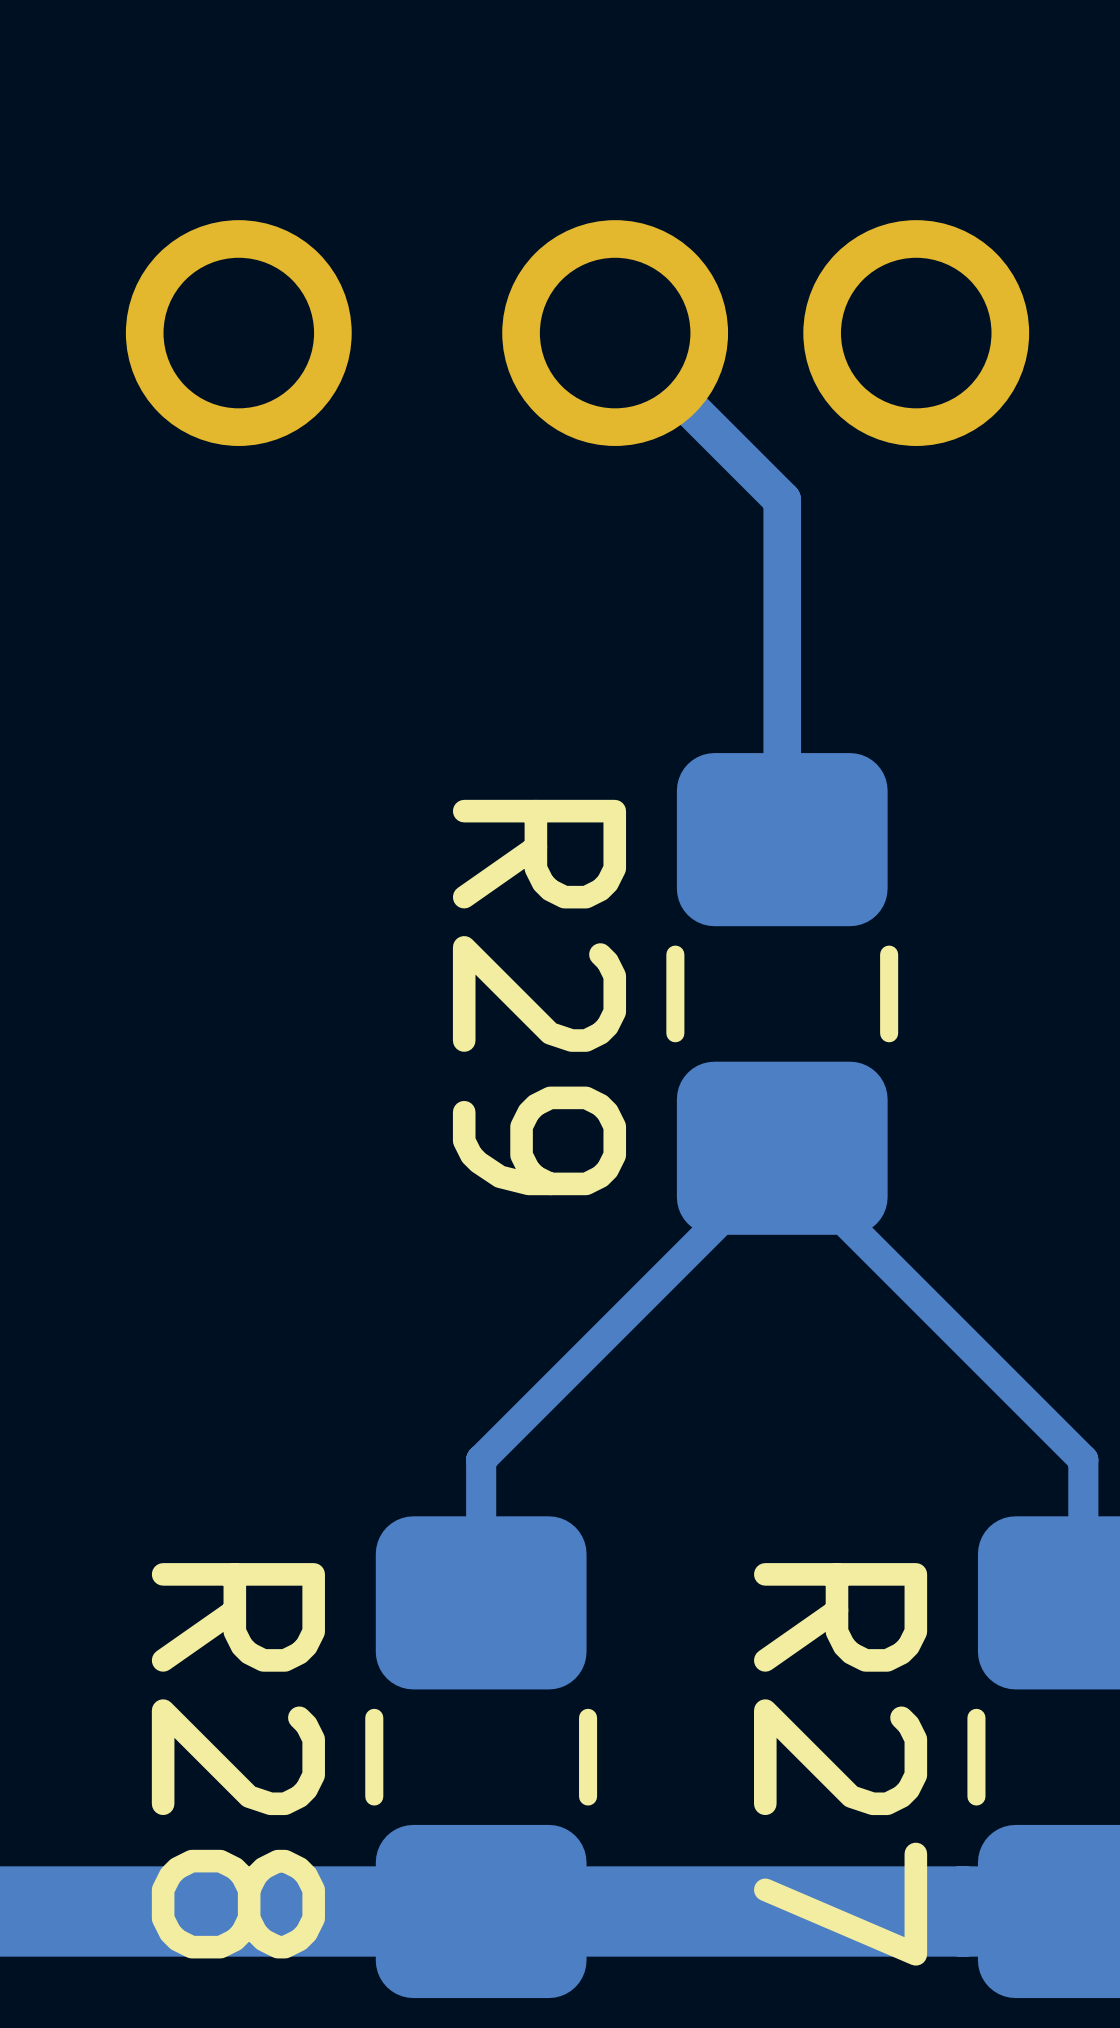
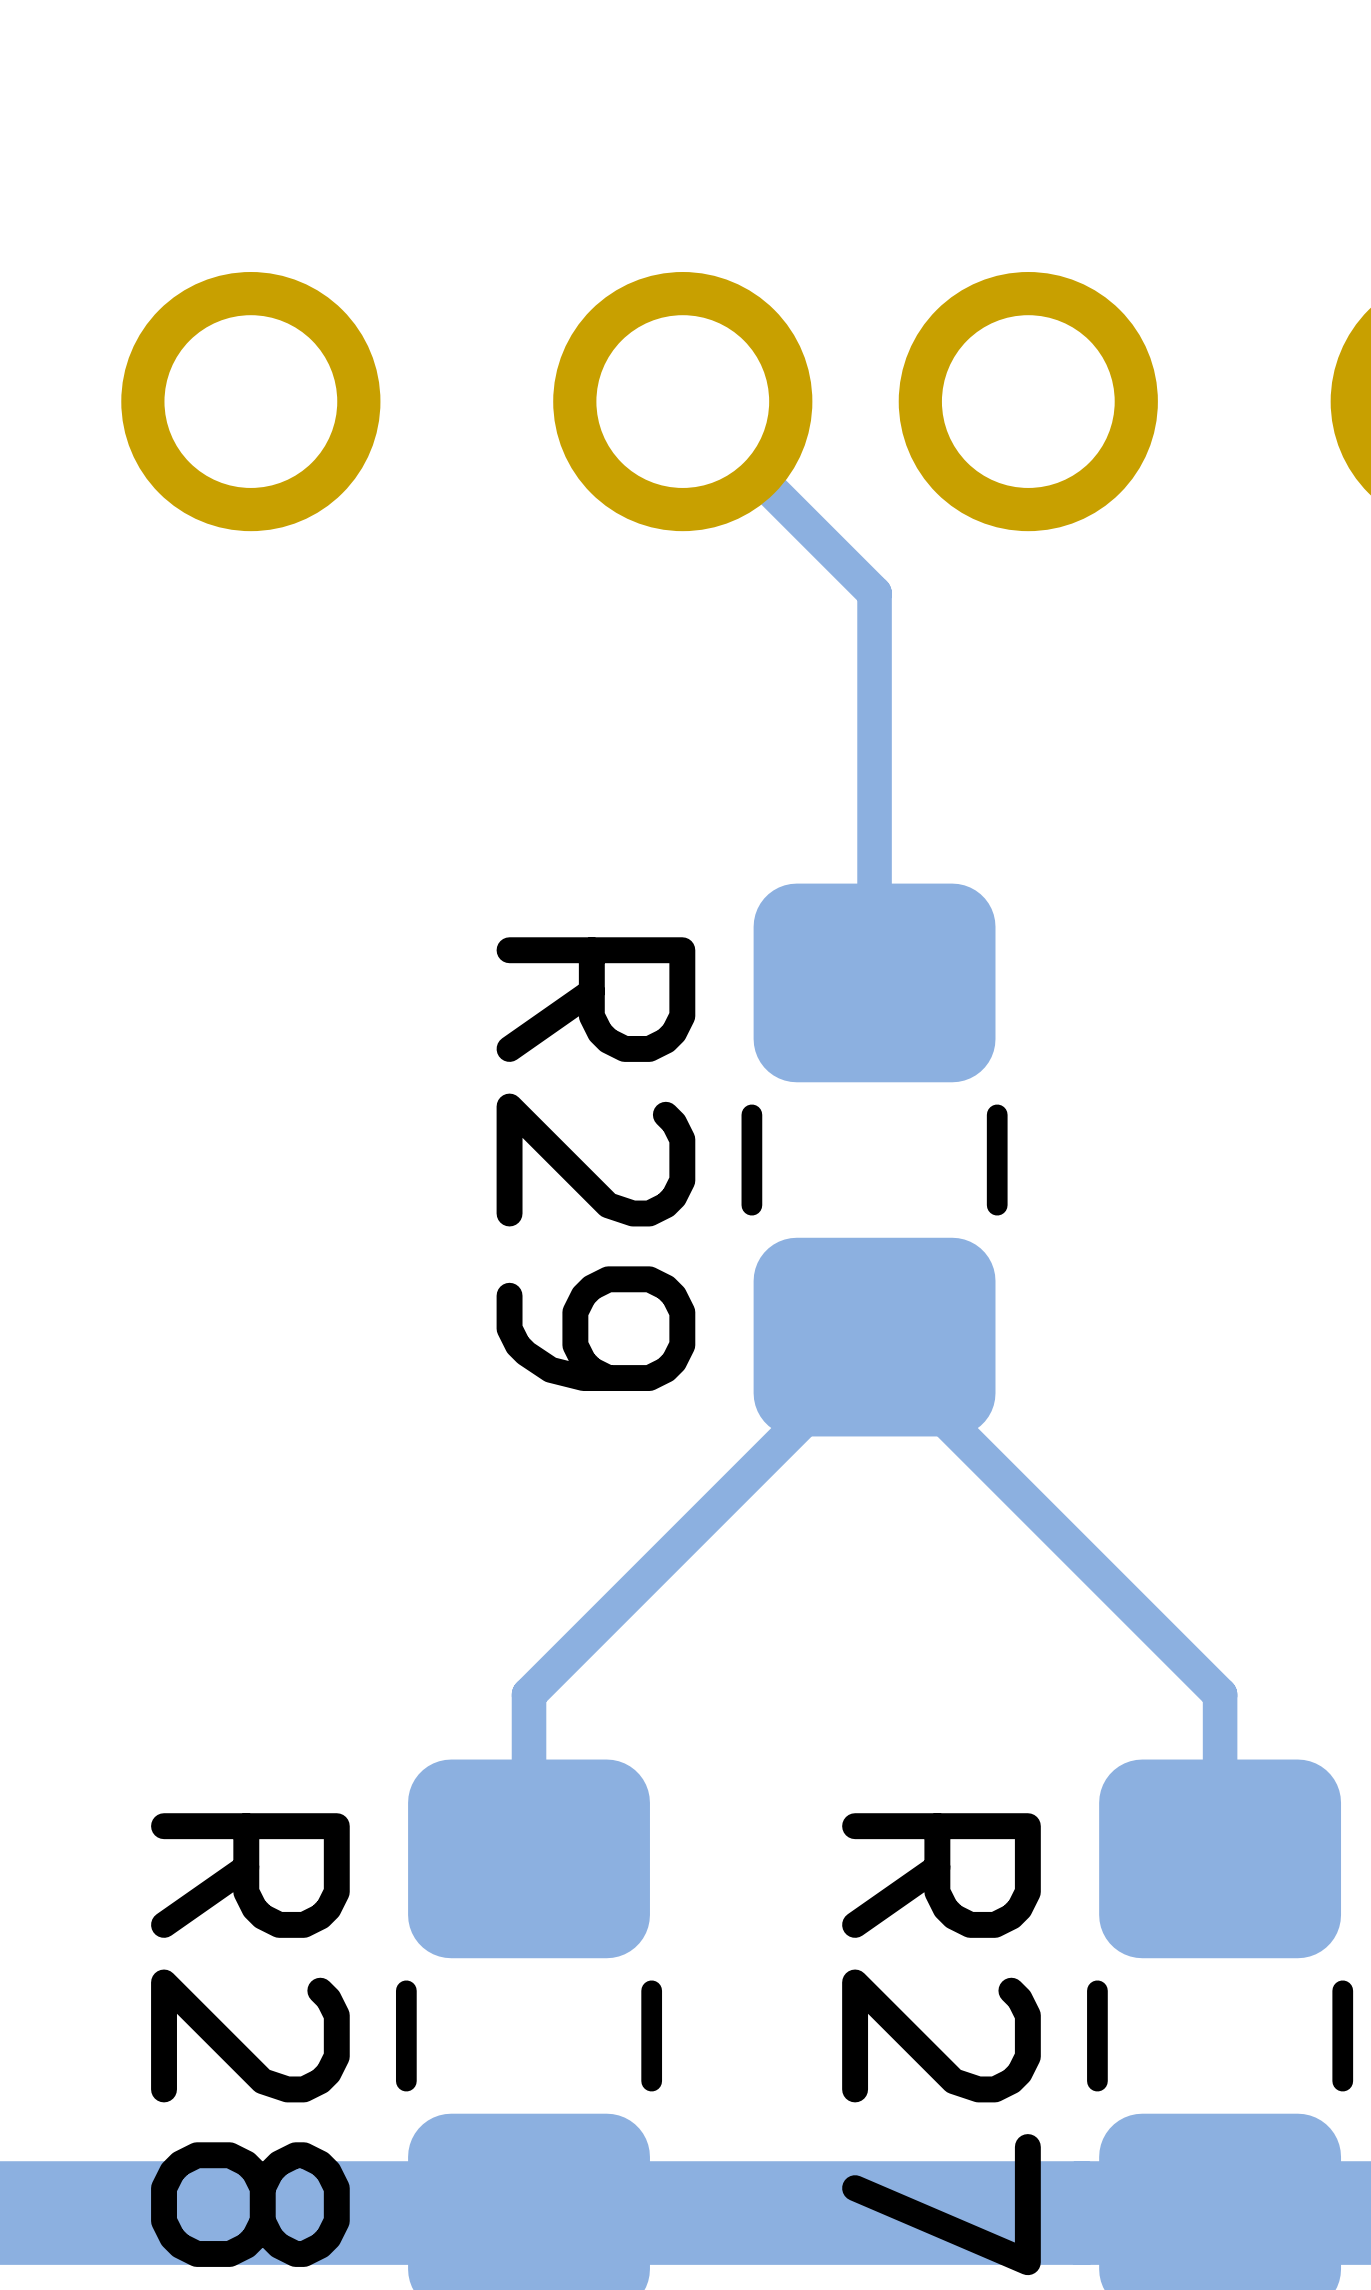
track width: thick (615, 333) (782, 500) (782, 850) -> thin (682, 401) (874, 593) (874, 995)

